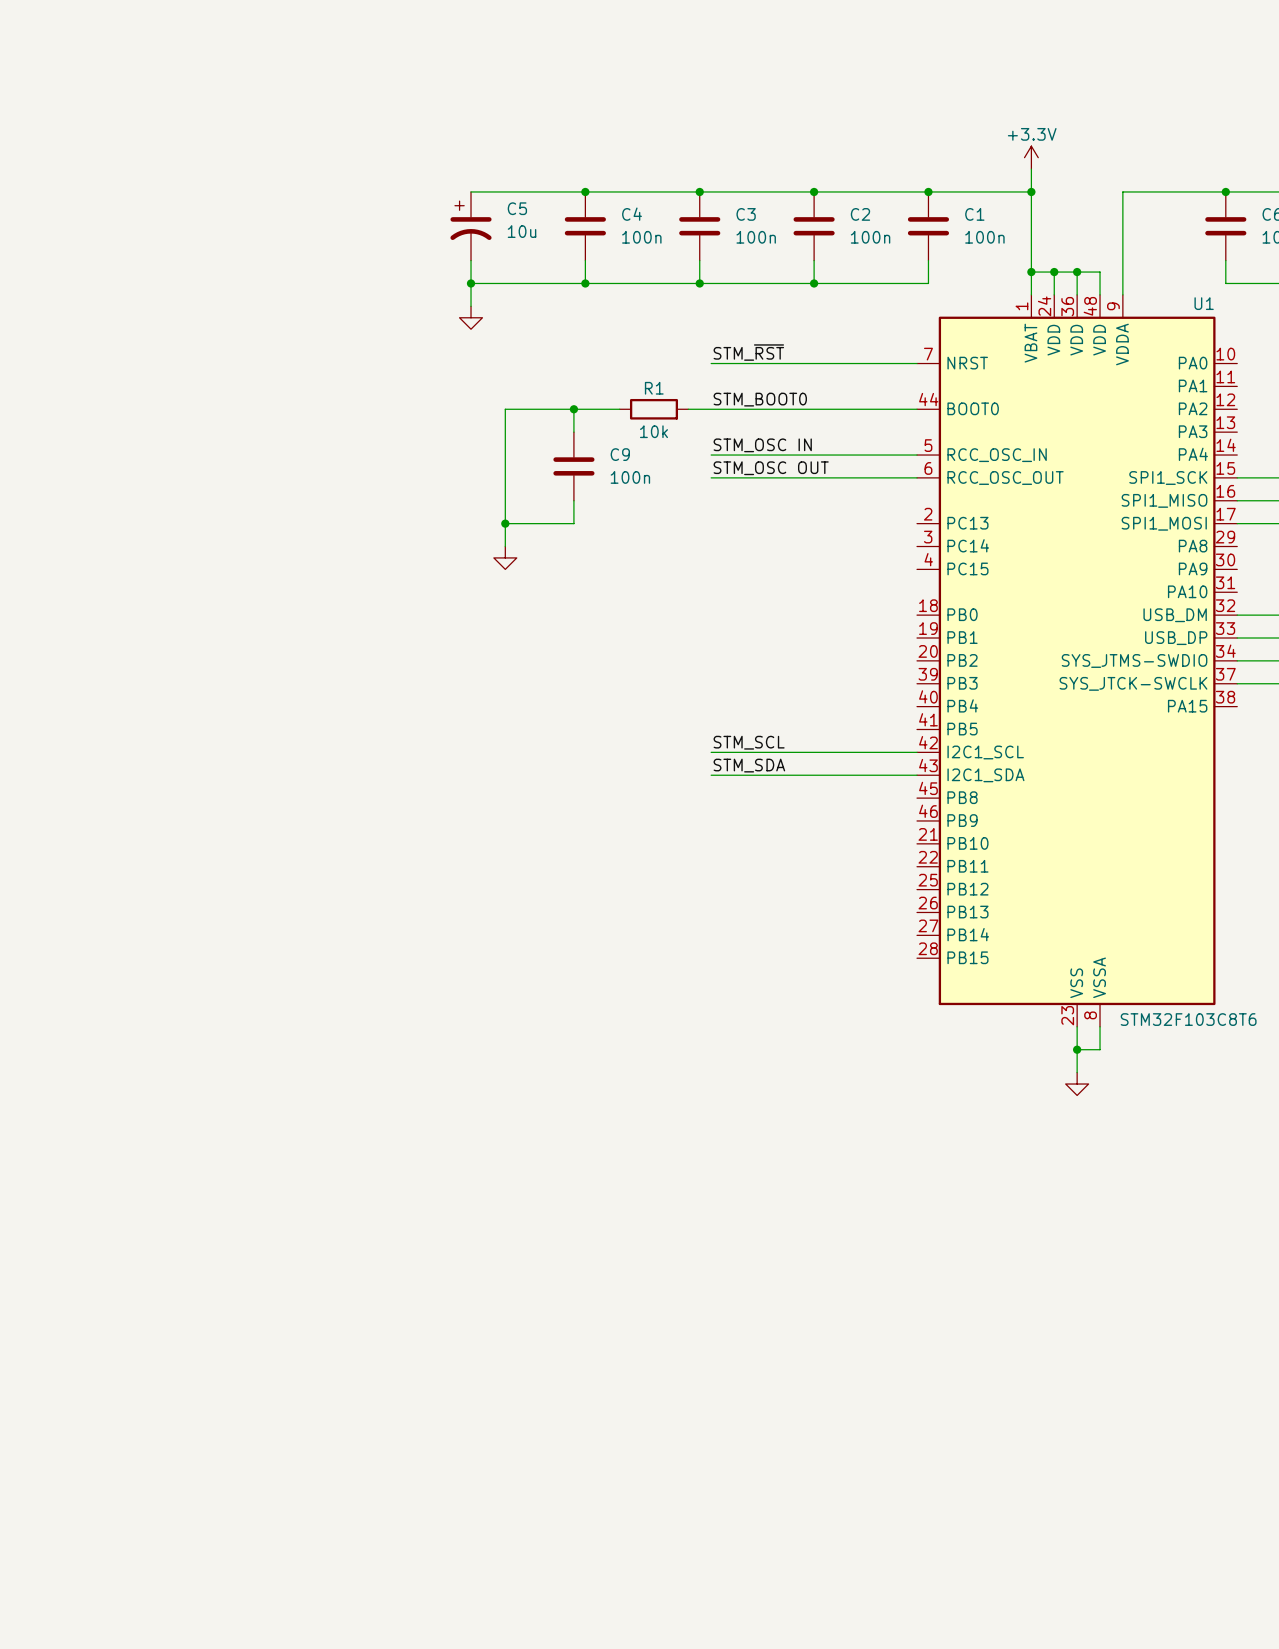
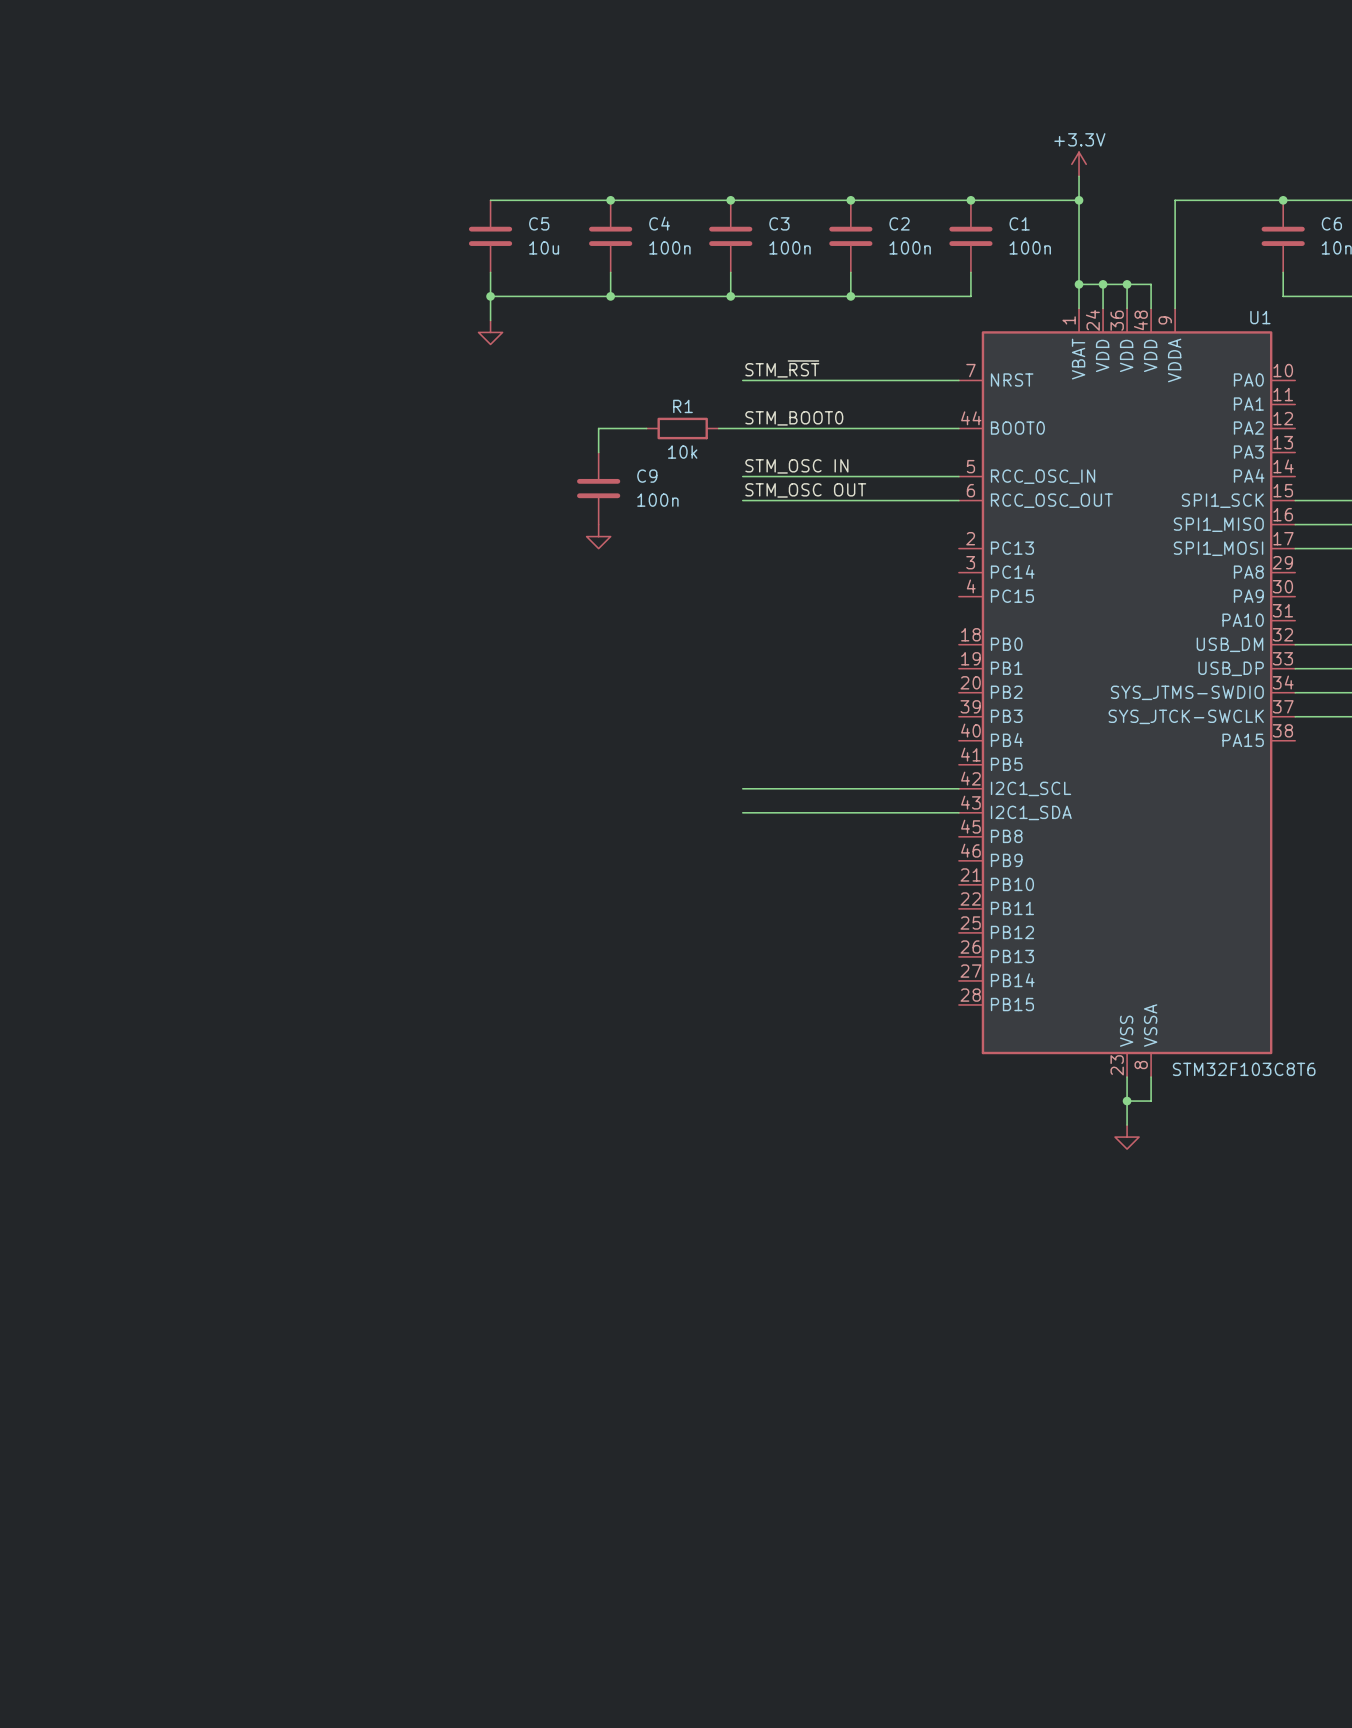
C5 symbol: [450, 191, 492, 261] -> [468, 200, 513, 273]
wire: (573, 409) (505, 409) (505, 546) -> none
junction: (573, 409) -> none
wire: (573, 500) (573, 523) (505, 523) -> none
junction: (505, 523) -> none
power symbol position: (505, 557) -> (598, 536)
label: STM_SCL (749, 742) -> none
label: STM_SDA (749, 765) -> none

